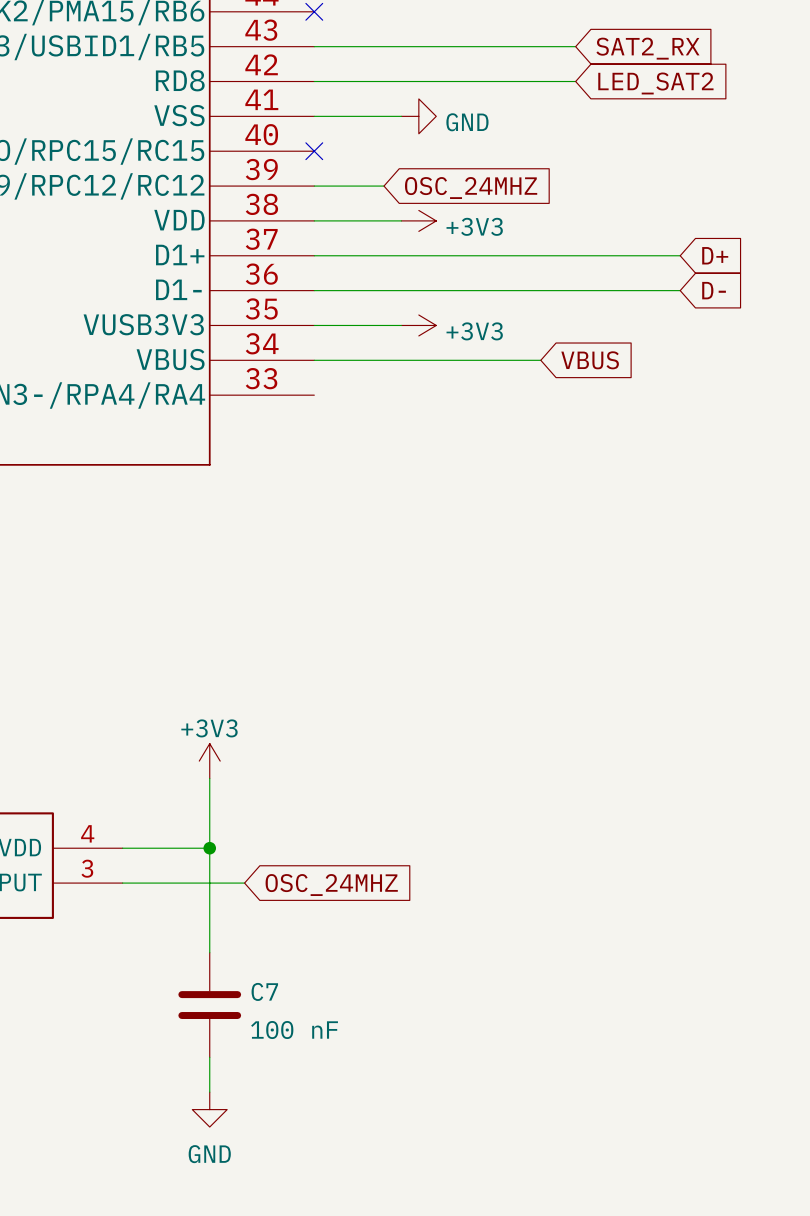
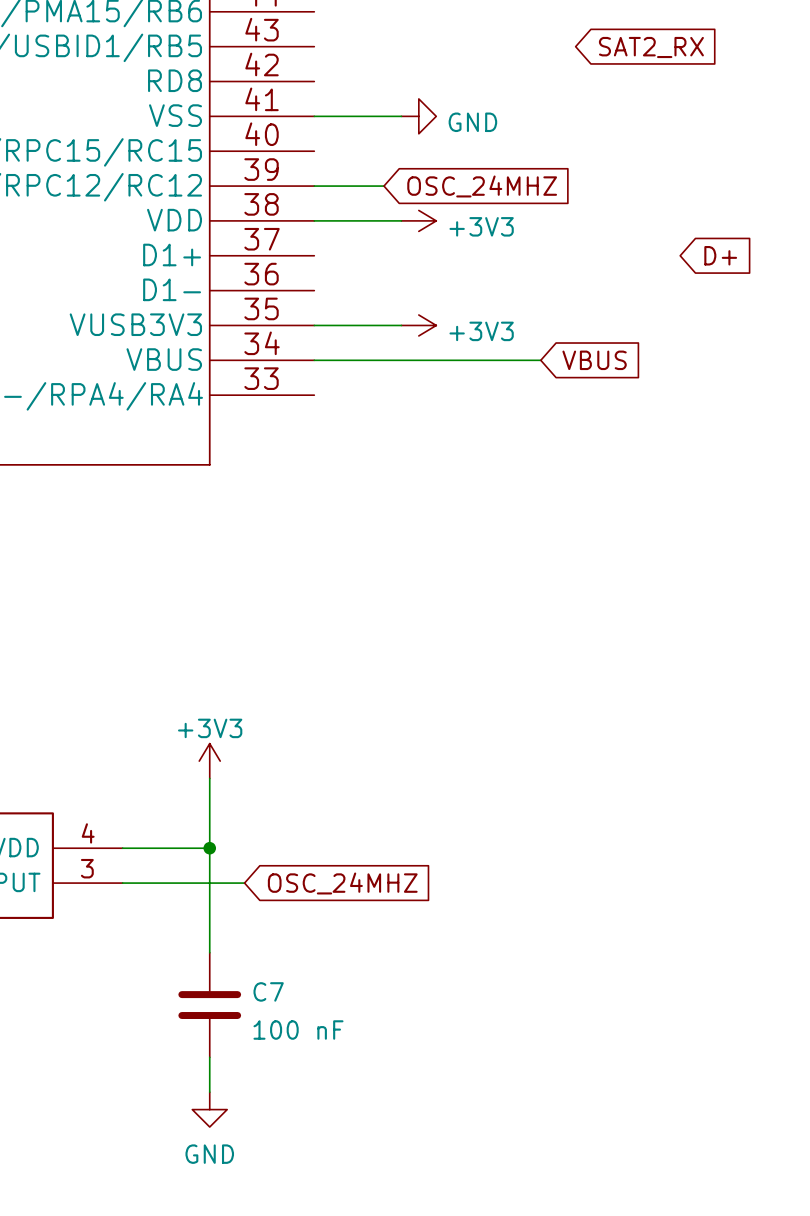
no-connect mark: (314, 11) -> none
wire: (314, 46) (575, 46) -> none
wire: (314, 81) (575, 81) -> none
global label: LED_SAT2 (655, 83) -> none
no-connect mark: (314, 151) -> none
wire: (314, 255) (680, 255) -> none
wire: (314, 290) (680, 290) -> none
global label: D- (714, 290) -> none

